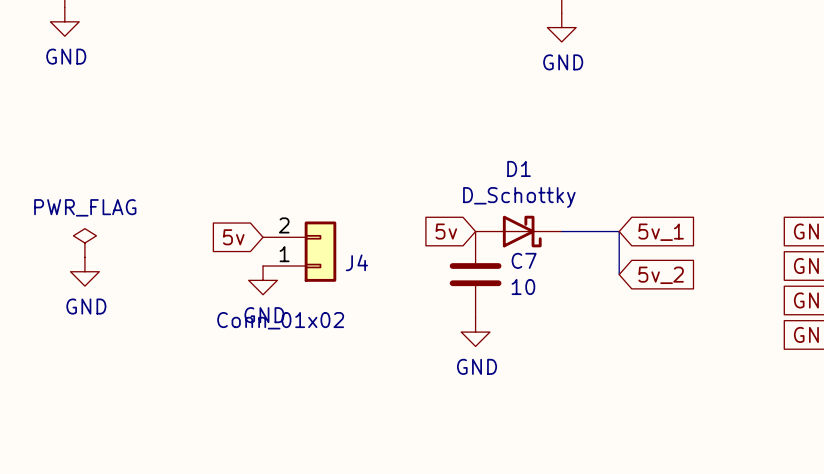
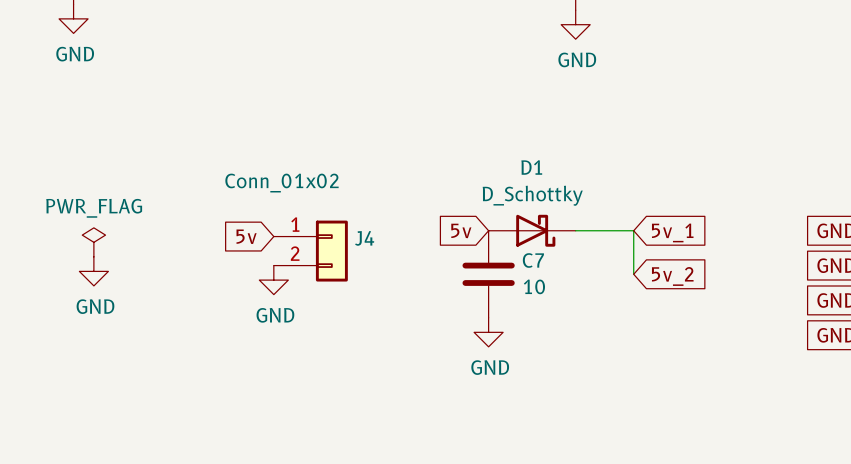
J4 flip: as is (320, 251) -> up-down (331, 251)

